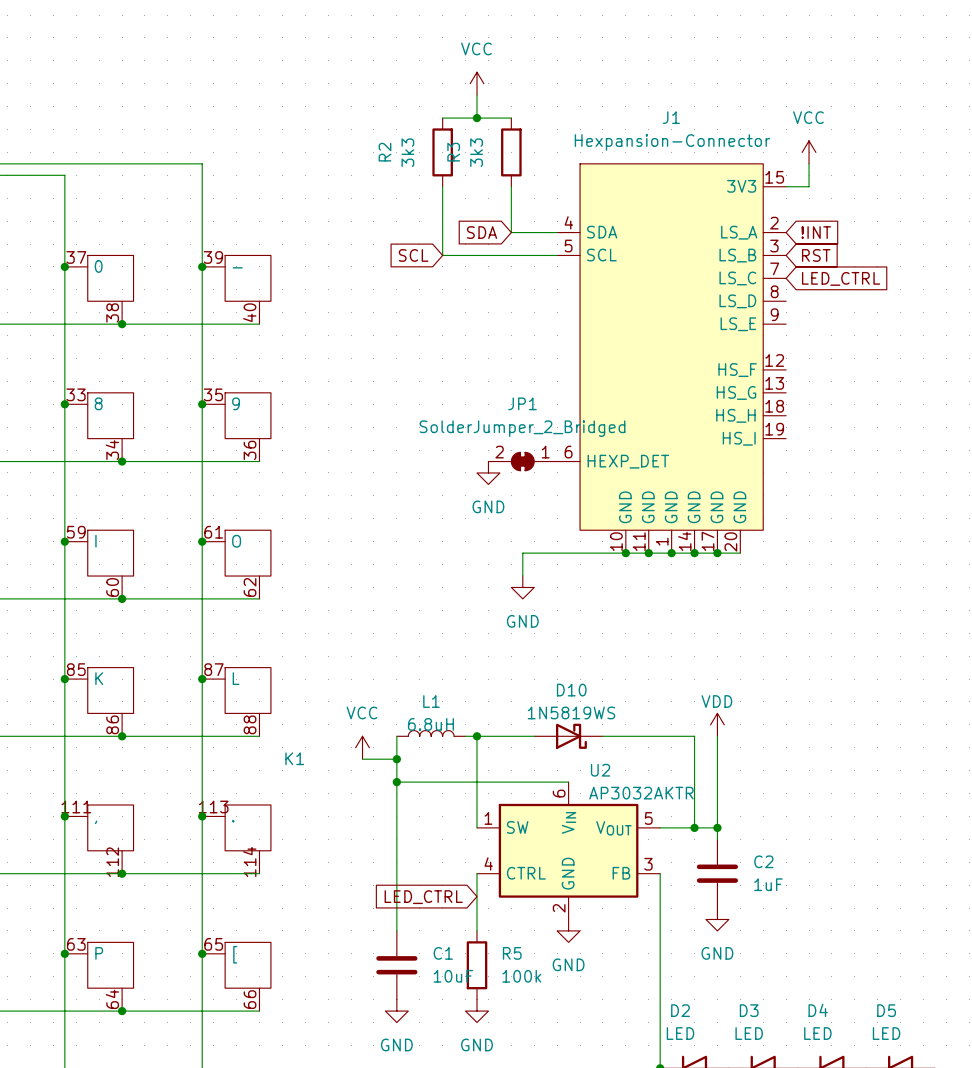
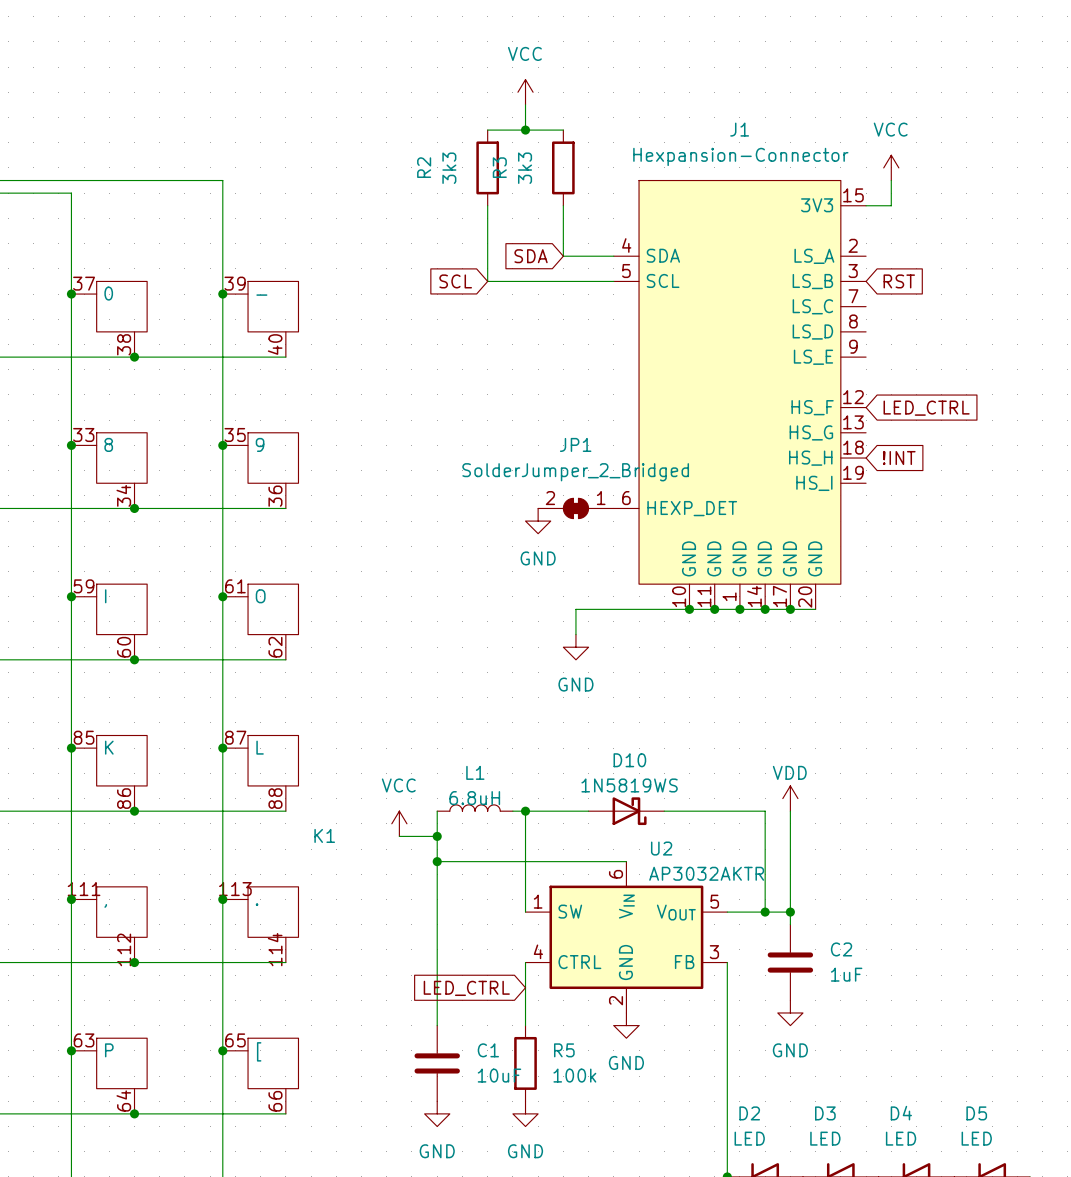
global label position: !INT (816, 232) -> !INT (899, 458)
global label position: LED_CTRL (841, 278) -> LED_CTRL (926, 408)

